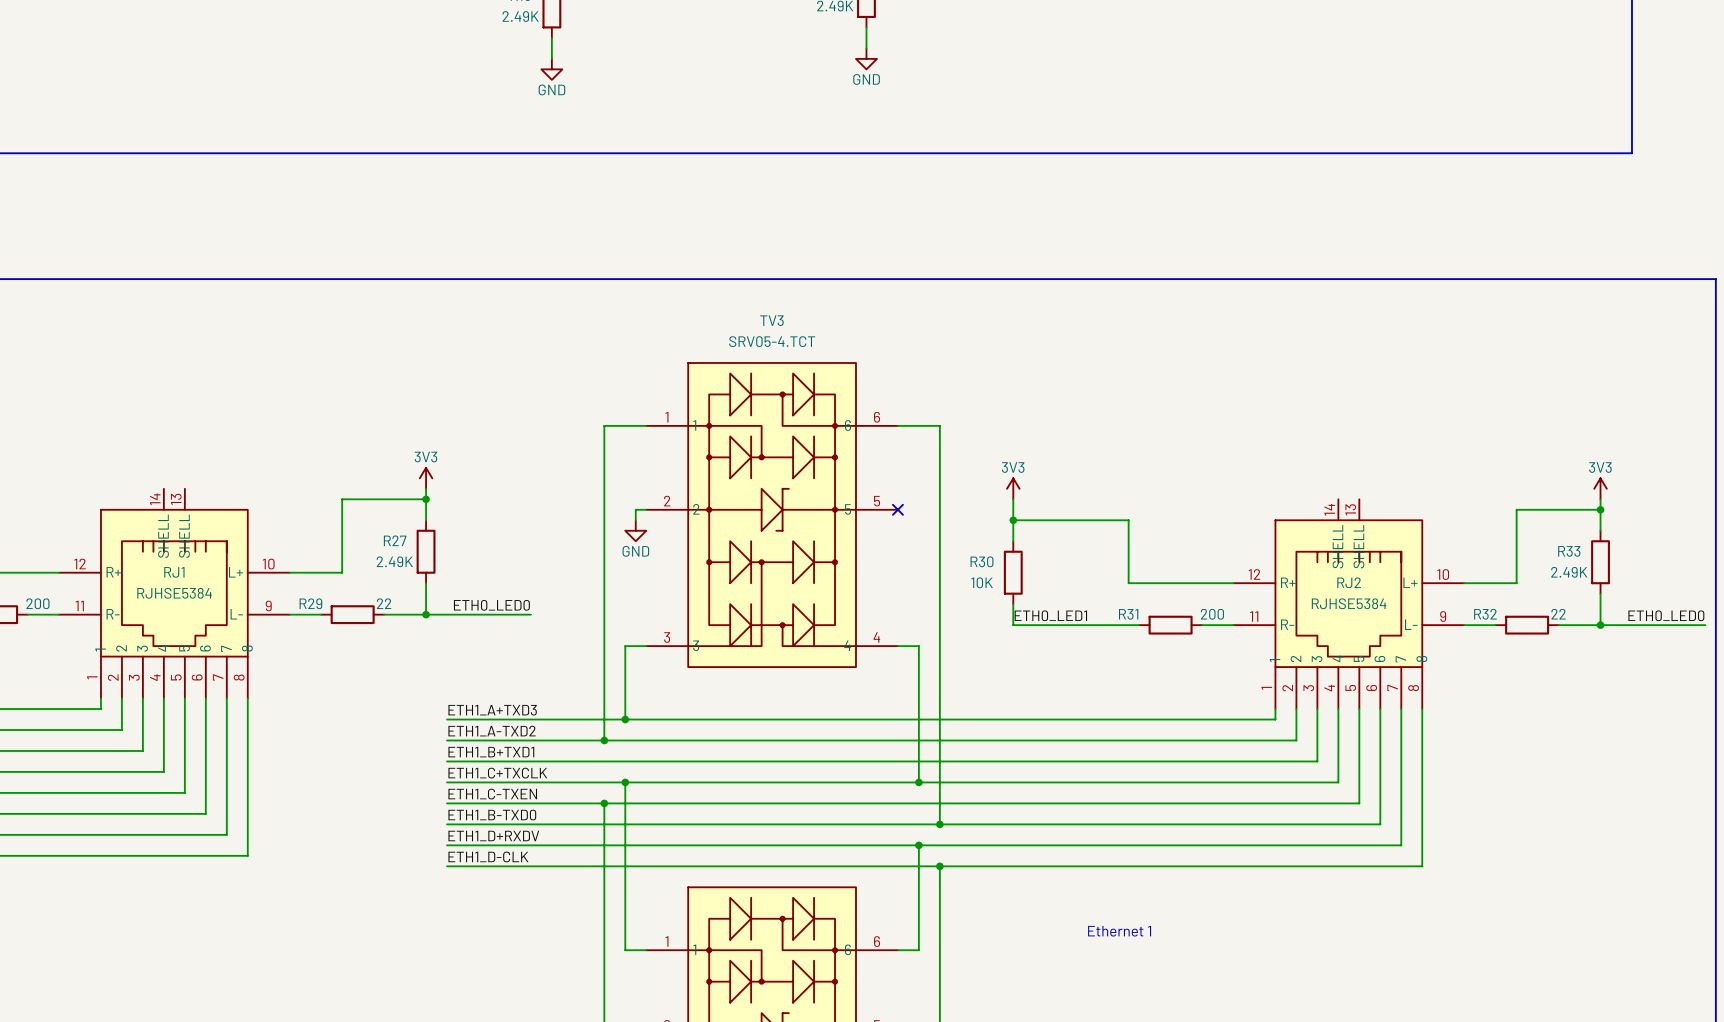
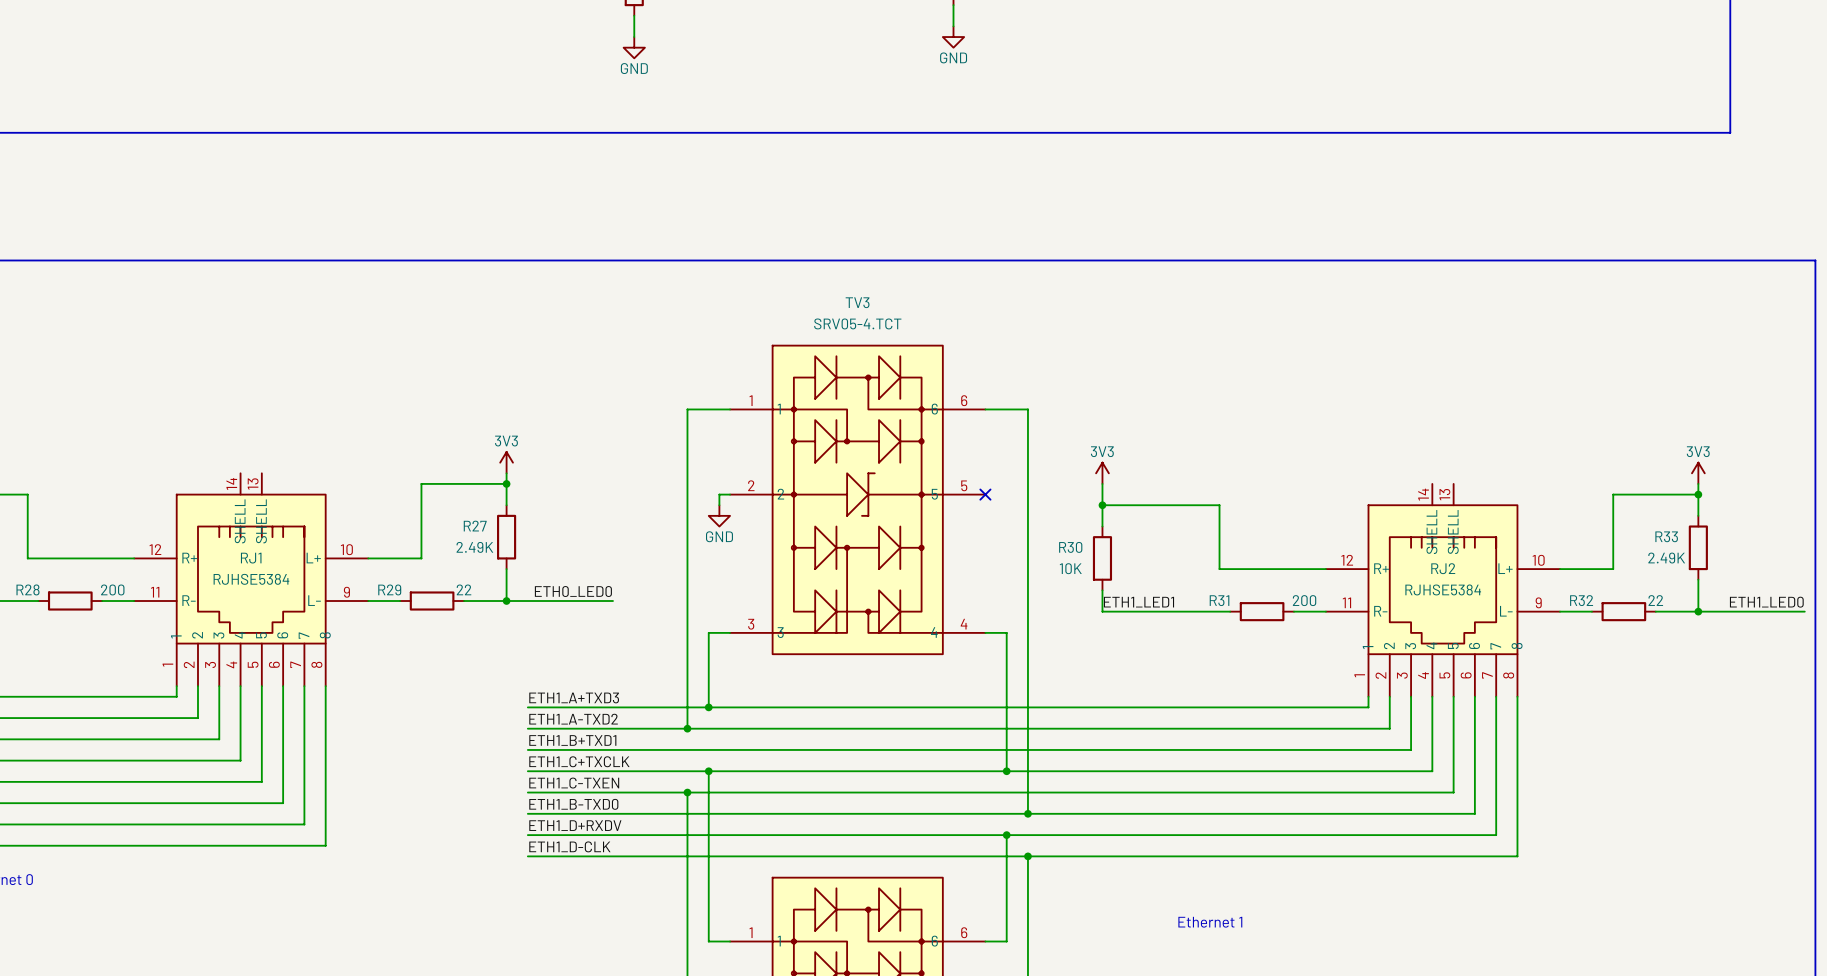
label: ETH0_LED1 (1050, 615) -> ETH1_LED1 (1138, 602)
label: ETH0_LED0 (1666, 615) -> ETH1_LED0 (1766, 602)

